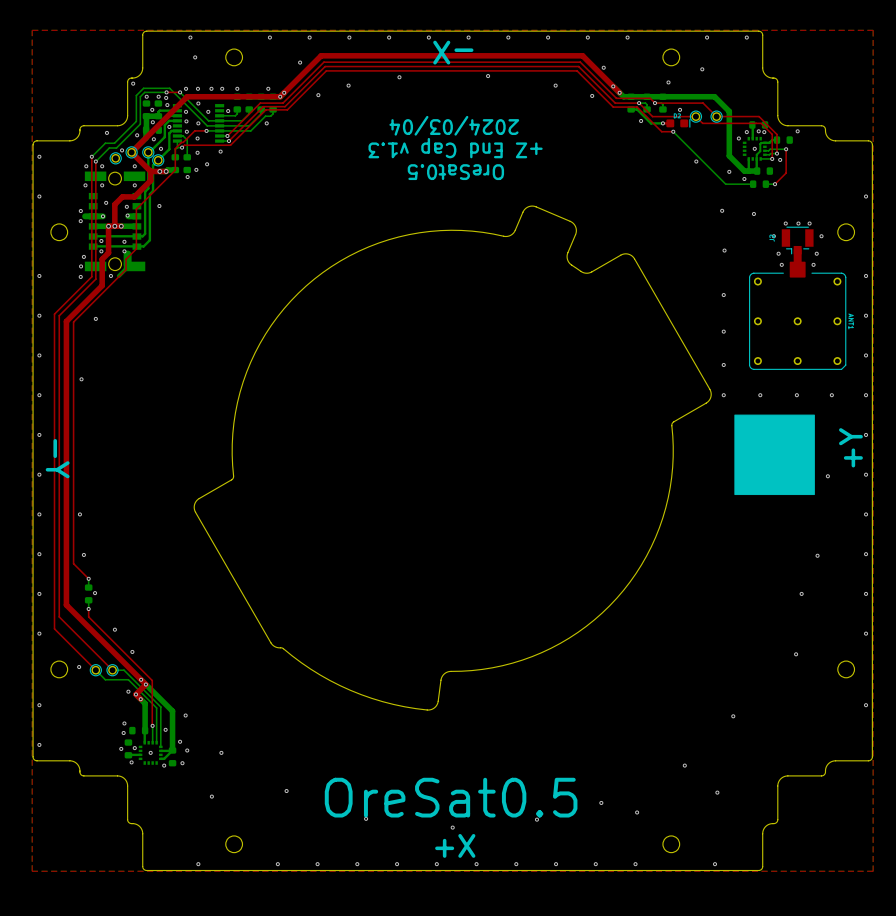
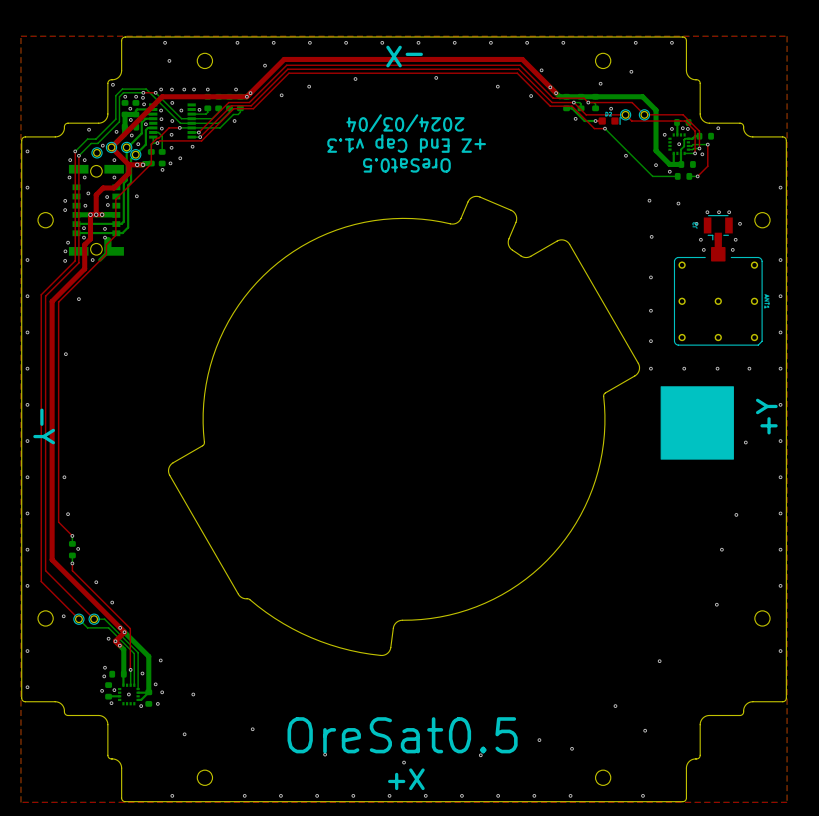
bottom track: (127, 215) (136, 216) -> none
bottom track: (85, 216) (102, 216) -> none

